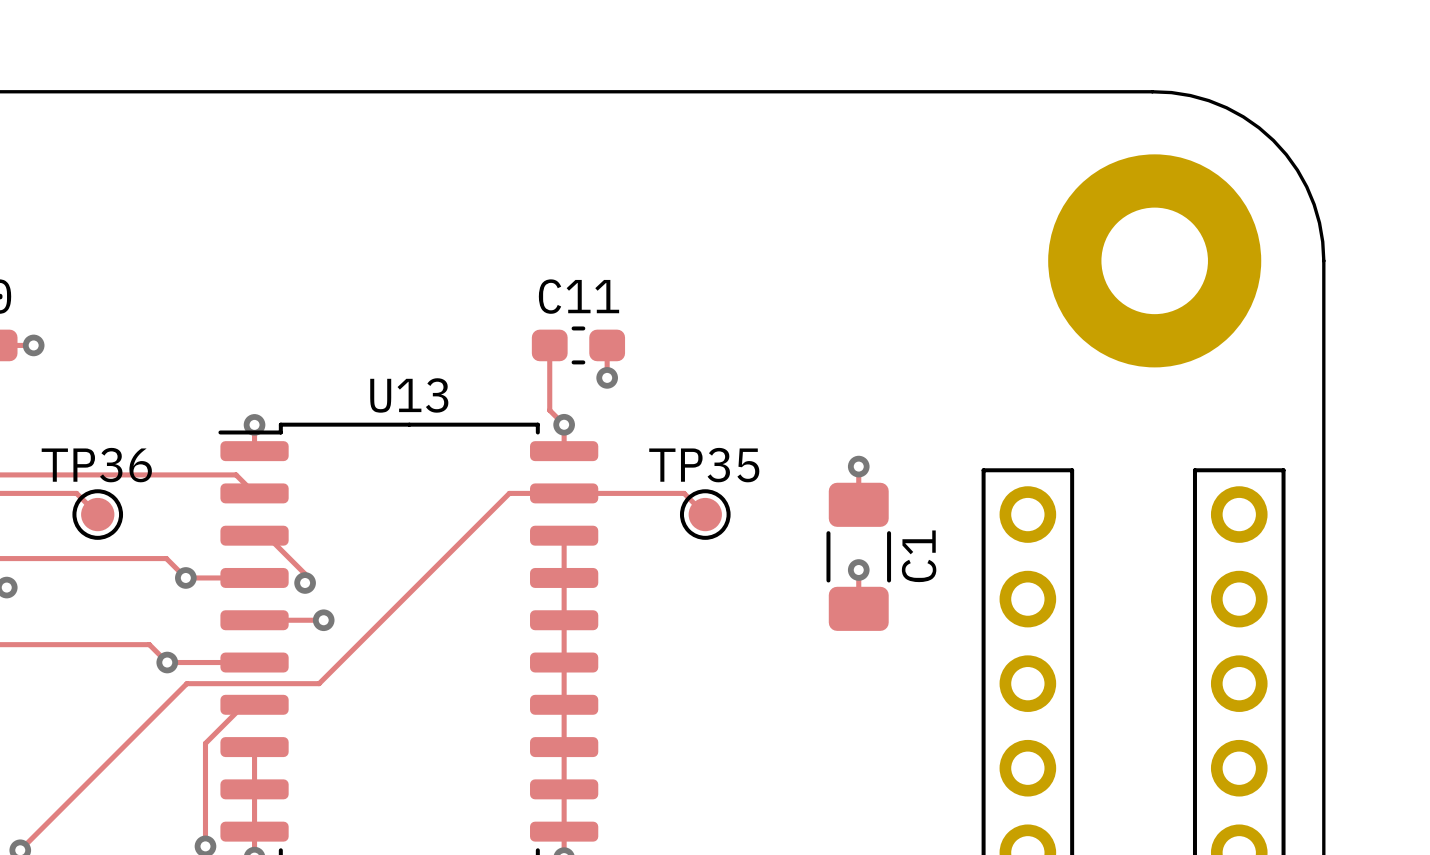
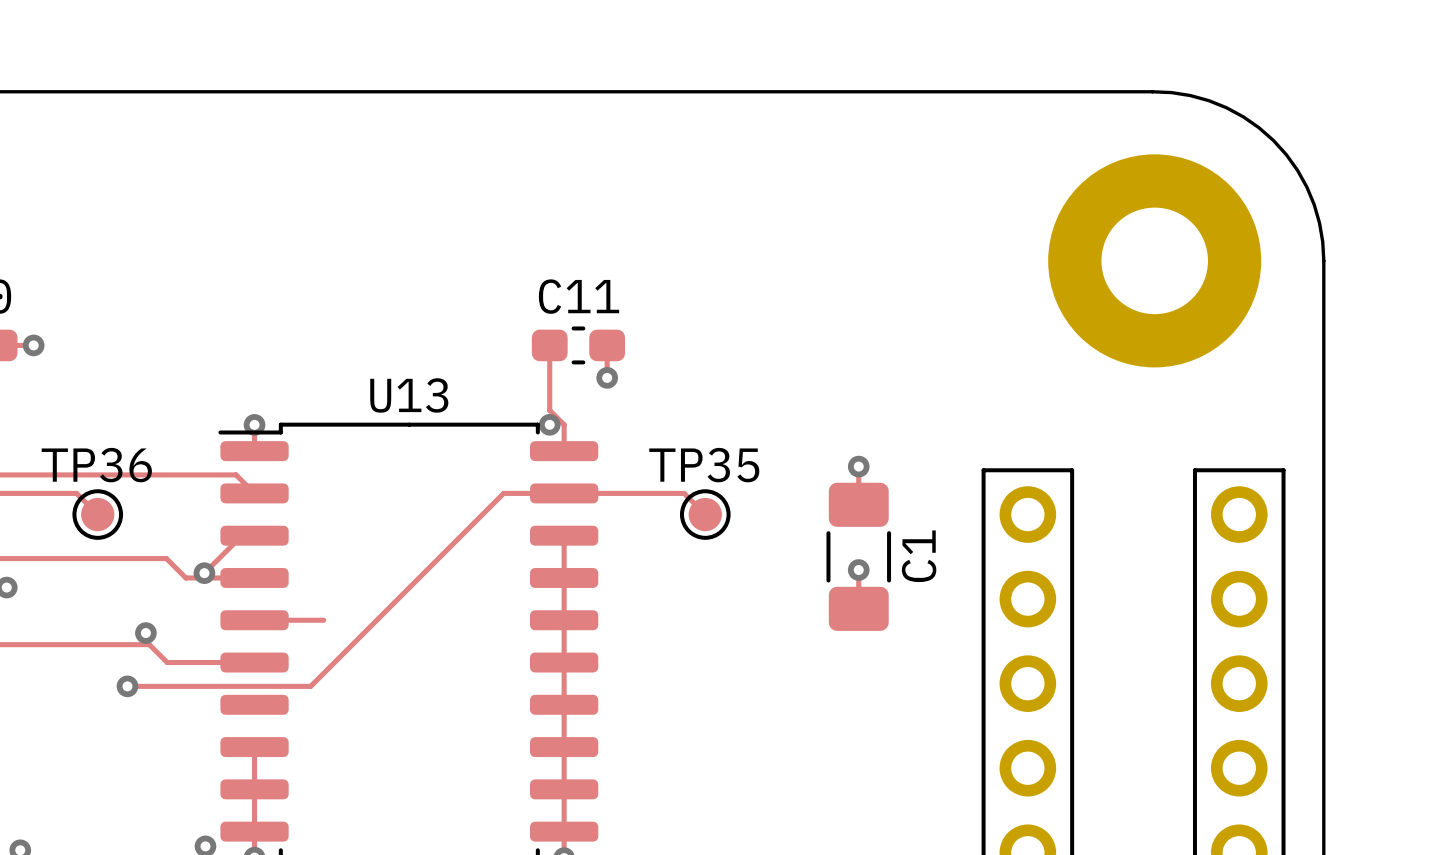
via position: (564, 424) -> (549, 424)
track: (509, 493) (319, 683) (186, 683) (20, 850) -> (509, 493) (503, 493) (310, 686) (127, 686)
track: none -> (254, 535) (241, 535) (204, 573)
track: (266, 535) (305, 574) (305, 582) -> none
via position: (185, 577) -> (204, 573)
via: (305, 582) -> none
via: (323, 620) -> none
via: none -> (145, 633)
via: (167, 662) -> none
via: none -> (127, 686)
track: (244, 704) (205, 743) (205, 846) -> none

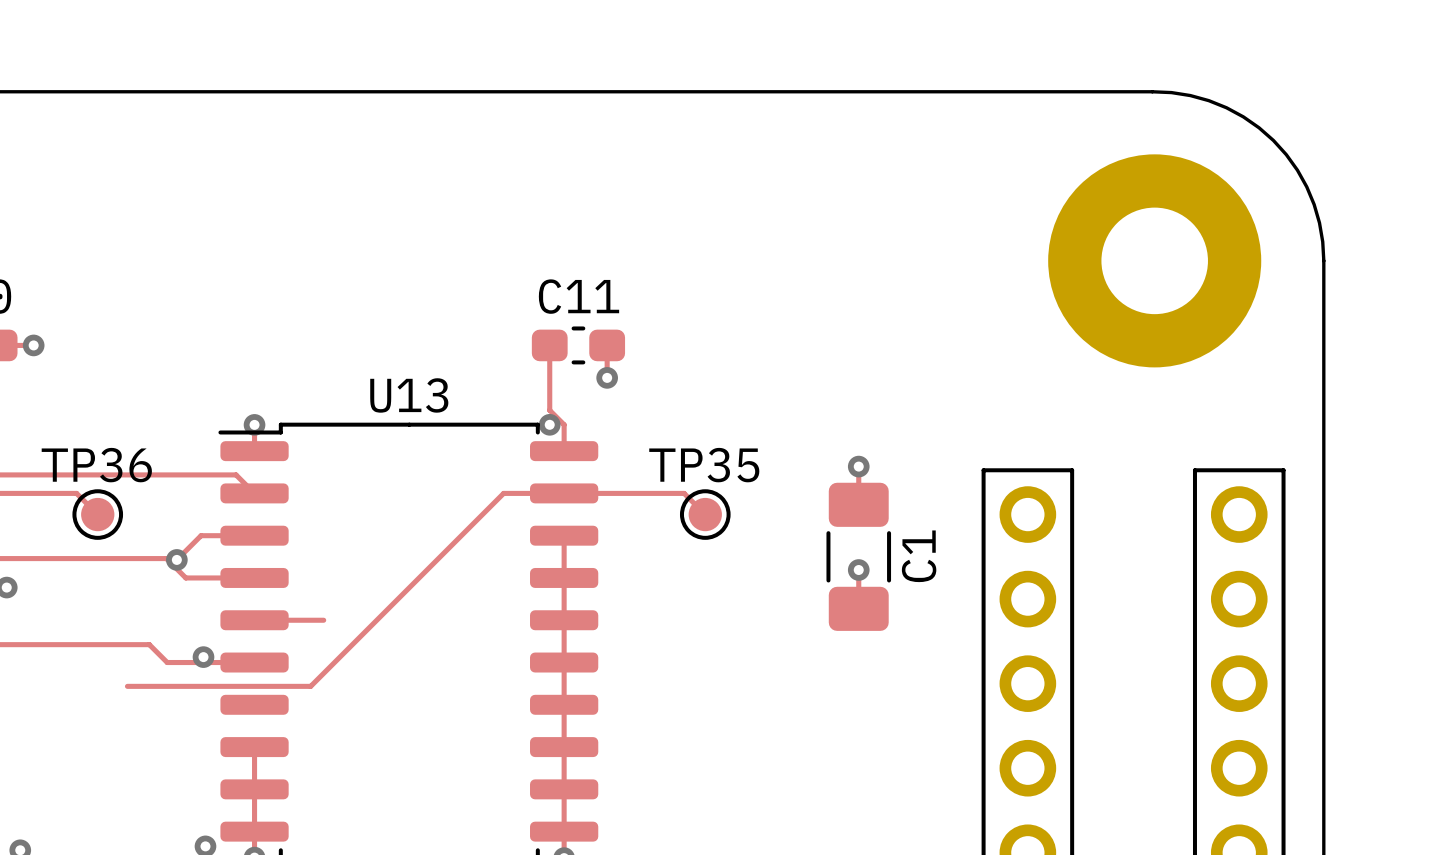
track: (241, 535) (204, 573) -> (241, 535) (201, 535) (176, 559)
via position: (204, 573) -> (176, 559)
via: (145, 633) -> none
via: none -> (203, 657)
via: (127, 686) -> none

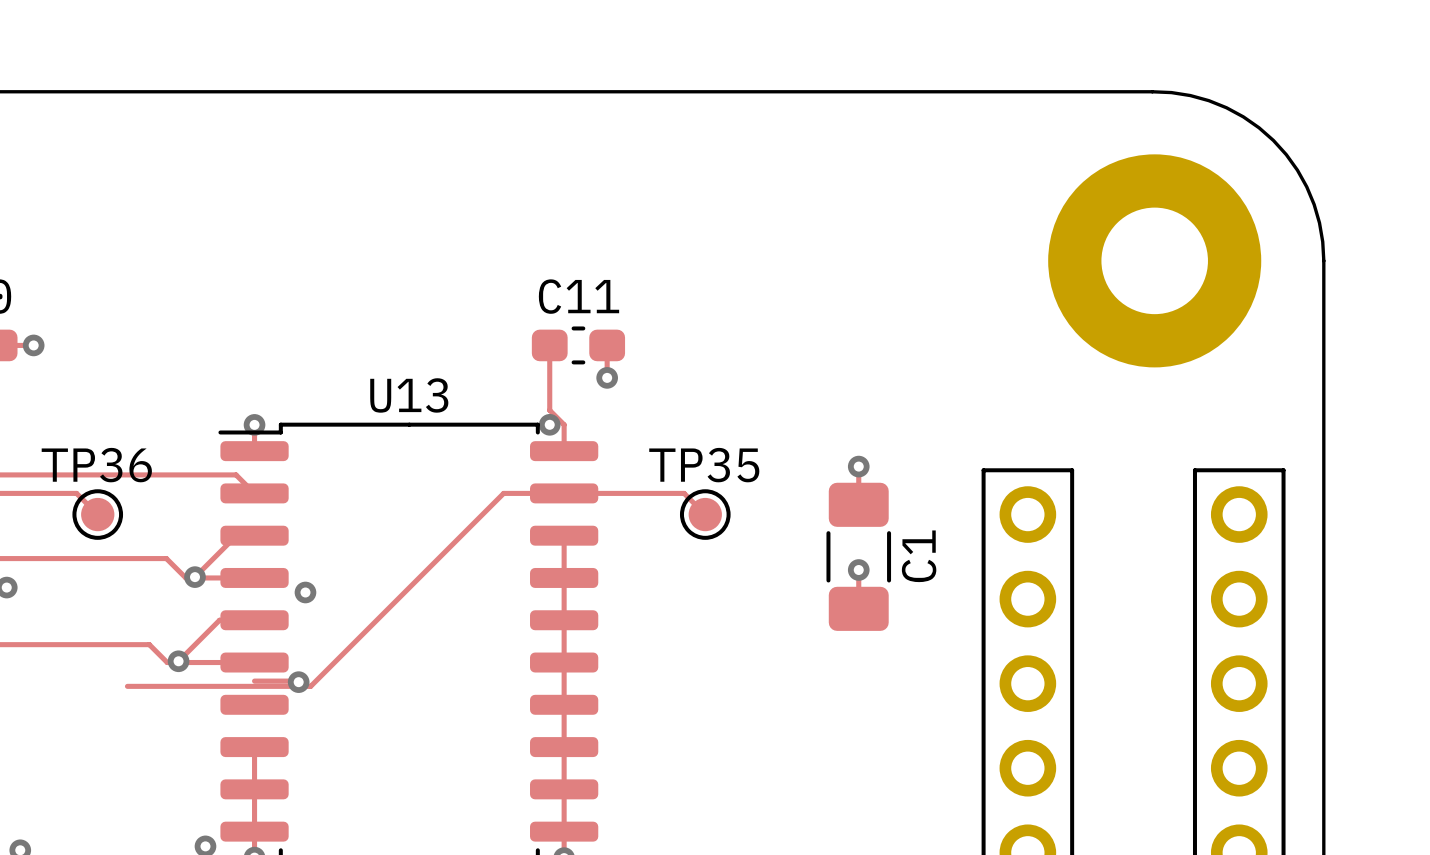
track: (236, 535) (201, 535) (176, 559) -> (236, 535) (194, 577)
via position: (176, 559) -> (194, 577)
via: none -> (305, 592)
track: (254, 620) (323, 620) -> (254, 620) (219, 620) (178, 661)
via position: (203, 657) -> (178, 661)
track: none -> (254, 681) (298, 682)
via: none -> (298, 682)

